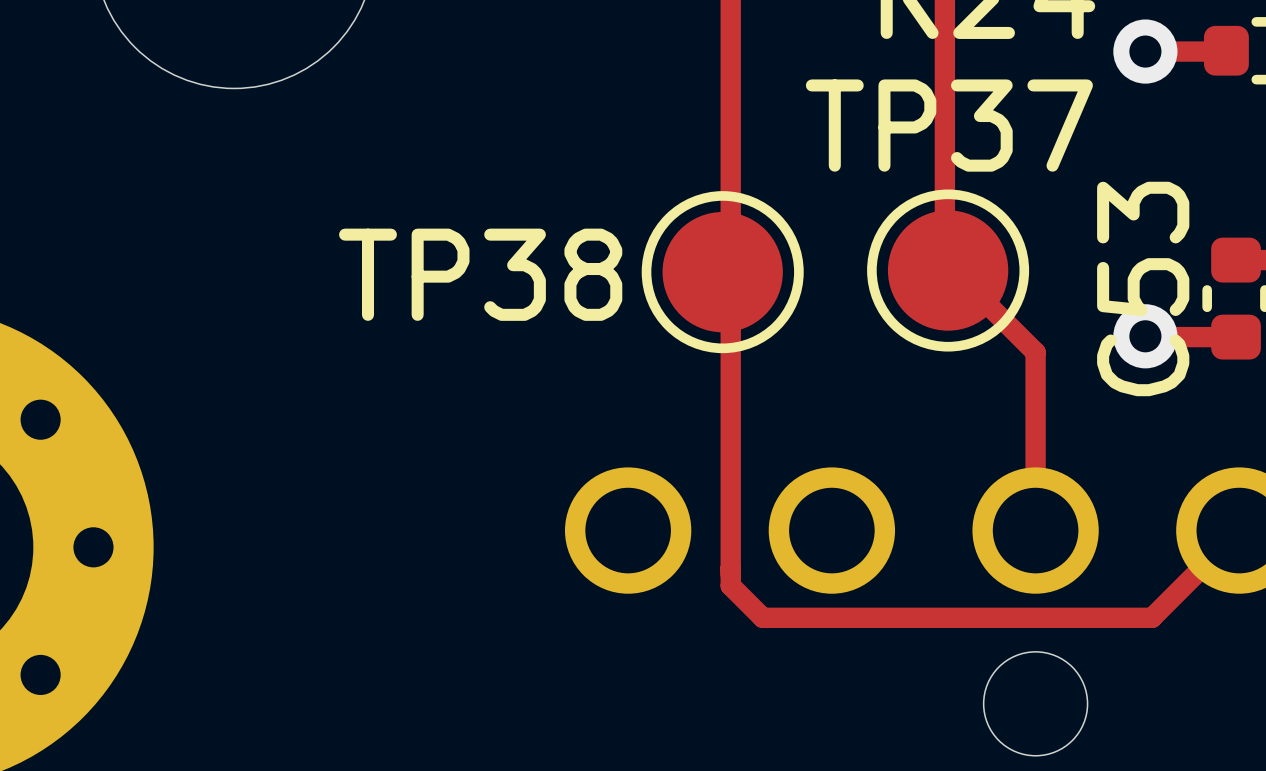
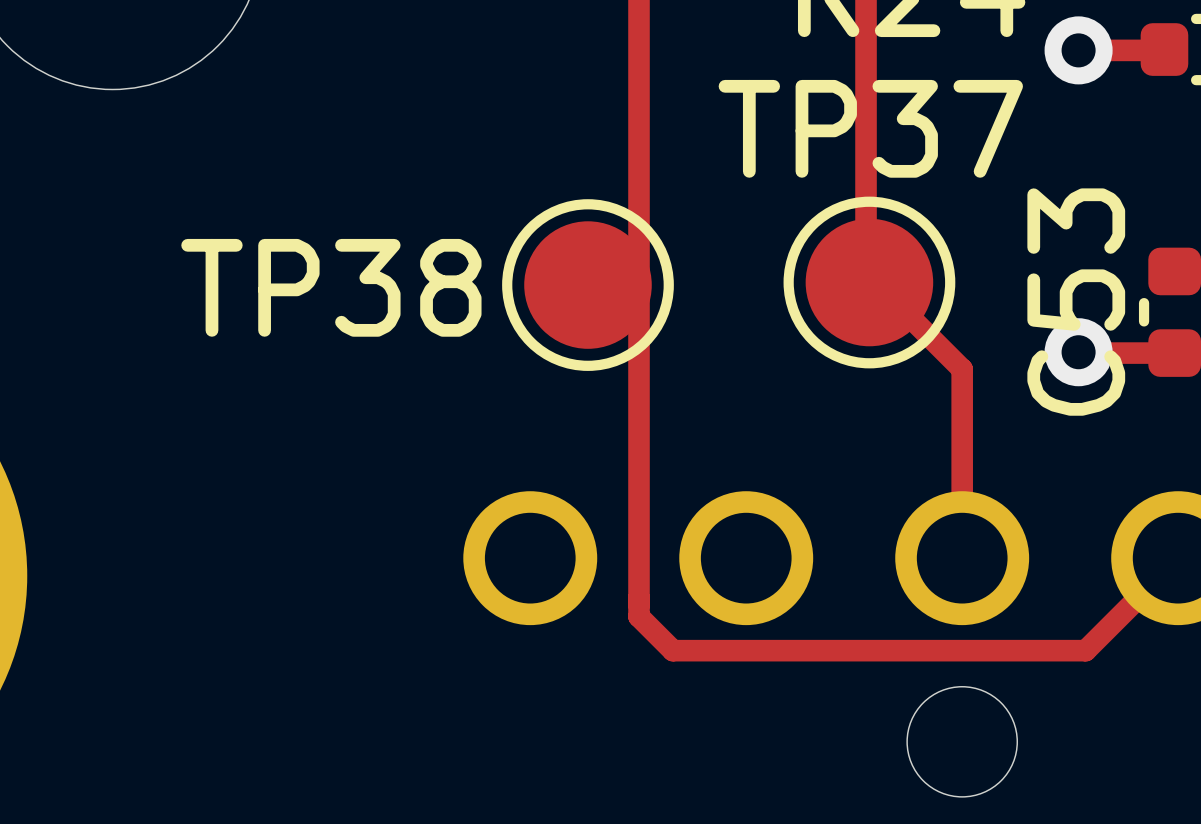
TP38 position: (722, 272) -> (587, 285)

